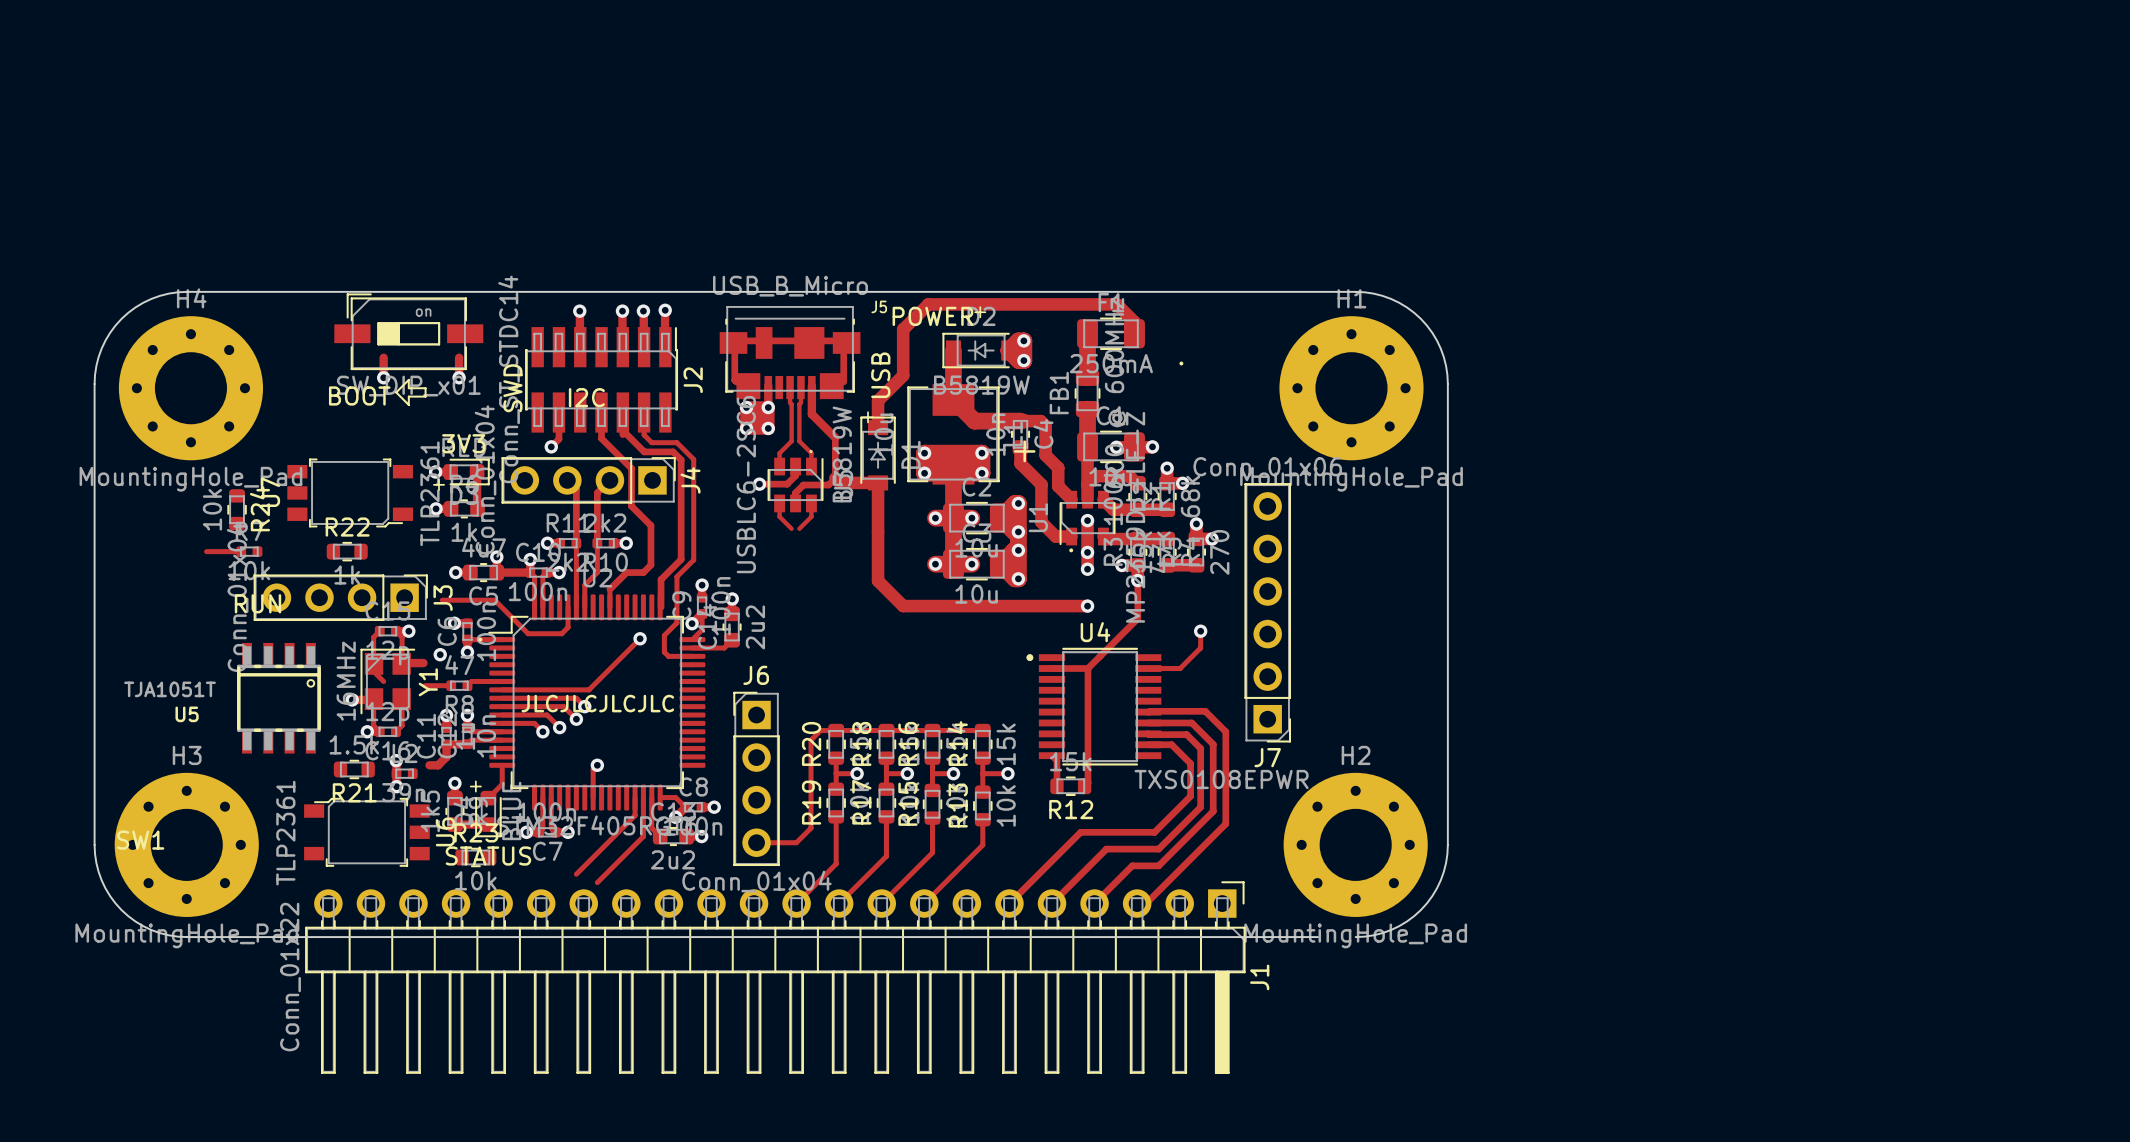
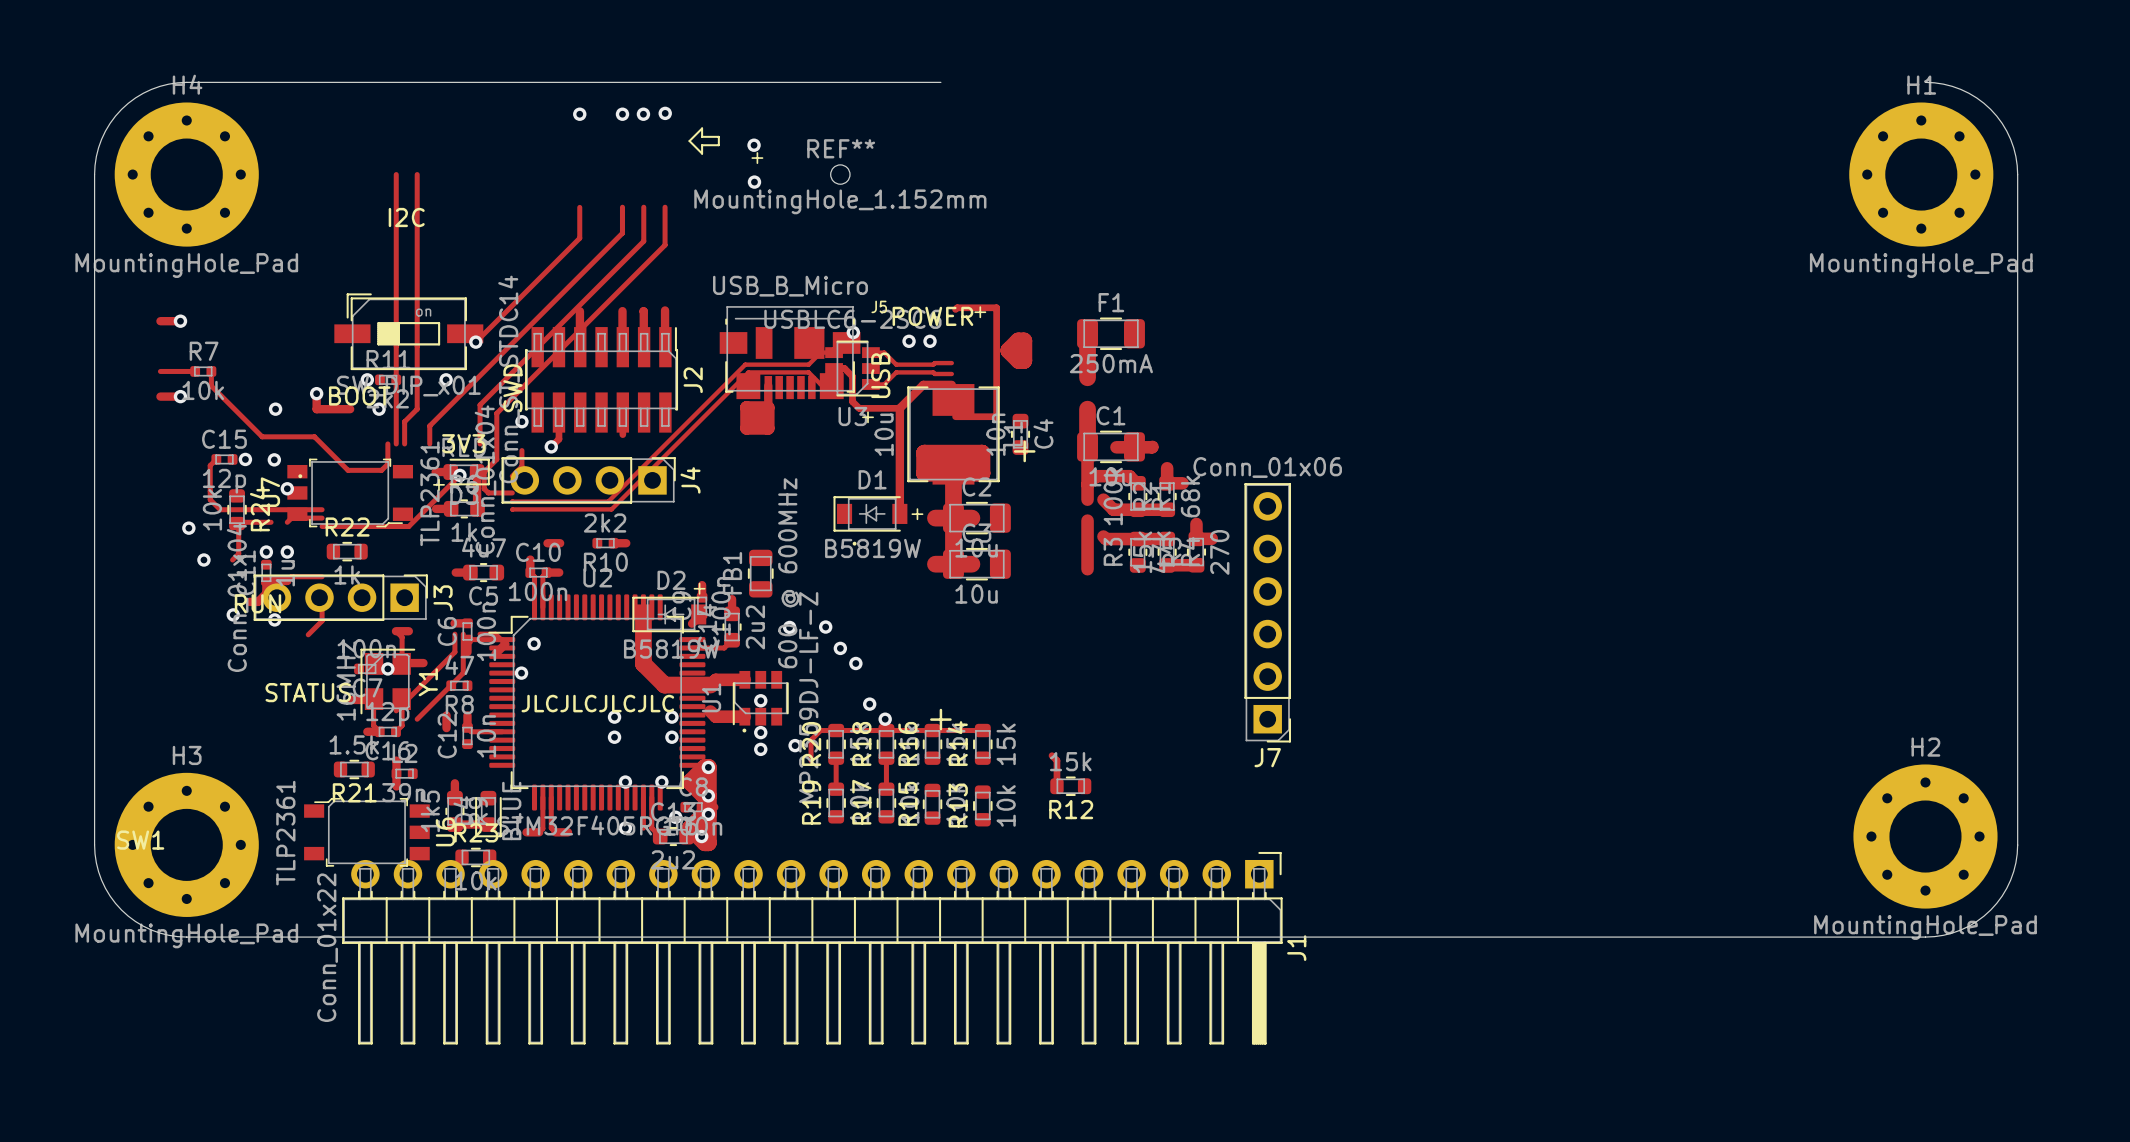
board edge: none -> (1925, 82) (1943, 84) (1960, 89) (1976, 97) (1990, 109) (2002, 123) (2010, 139) (2017, 165) (2017, 845)
via: none -> (665, 113)
via: none -> (579, 114)
via: none -> (622, 114)
via: none -> (643, 114)
via: none -> (754, 145)
text: none -> + (757, 158)
track: none -> (396, 174) (396, 443)
track: none -> (417, 174) (417, 409) (404, 421) (404, 443)
REF**: none -> MountingHole_1.152mm (840, 174)
via: none -> (754, 182)
track: none -> (579, 207) (579, 238) (475, 342)
track: none -> (622, 207) (622, 233) (429, 425) (429, 443)
track: none -> (643, 207) (643, 241) (480, 404) (480, 443)
track: none -> (665, 207) (665, 245) (496, 413) (496, 459) (484, 472) (484, 488) (488, 492) (512, 492)
track: none -> (955, 309) (957, 307) (996, 307) (996, 418) (994, 416) (955, 416)
via: (665, 310) -> none
via: (579, 311) -> none
via: (622, 311) -> none
via: (643, 311) -> none
track: none -> (160, 321) (180, 321)
via: none -> (180, 321)
via: none -> (853, 332)
track: (1134, 333) (1134, 322) (1116, 304) (928, 304) (903, 329) (903, 375) (878, 400) (878, 427) -> none
via: (1023, 340) -> none
via: none -> (909, 341)
via: none -> (930, 341)
via: none -> (475, 342)
track: (953, 350) (953, 399) (974, 421) (1040, 421) (1045, 425) (1045, 455) (1058, 467) (1058, 486) (1071, 499) -> none
D2 position: (979, 350) -> (669, 614)
track: none -> (834, 352) (820, 352) (808, 364) (745, 364) (608, 501) (512, 501)
track: none -> (870, 352) (884, 352) (896, 364) (951, 363)
track: (383, 357) (383, 377) -> none
track: (459, 357) (459, 377) -> none
via: (1023, 360) -> none
drawing: [1179, 361, 1184, 366] -> none
track: none -> (834, 368) (844, 368) (852, 376) (852, 401) (859, 408) (899, 408)
track: none -> (211, 371) (211, 386) (262, 436) (314, 436) (348, 470) (381, 470) (387, 464) (387, 443)
track: none -> (951, 373) (896, 372) (884, 384) (870, 384)
via: (383, 377) -> none
via position: (459, 377) -> (446, 379)
via: none -> (367, 379)
line: (408, 379) (408, 388) (425, 388) (425, 396) (408, 396) (408, 404) (396, 392) (408, 379) -> (702, 128) (702, 136) (718, 136) (718, 145) (702, 145) (702, 153) (689, 141) (702, 128)
track: (736, 381) (734, 380) (734, 340) (845, 340) (843, 342) (843, 381) -> none
board edge: (94, 384) (96, 366) (101, 348) (110, 332) (121, 318) (143, 302) (160, 295) (177, 292) (1355, 291) (1373, 293) (1390, 298) (1406, 307) (1426, 325) (1440, 348) (1447, 375) (1447, 853) (1443, 871) (1436, 888) (1420, 910) (1406, 921) (1390, 930) (1373, 935) (1355, 937) -> (94, 384) (94, 174) (96, 156) (105, 131) (121, 109) (143, 93) (160, 86) (186, 82) (940, 82)
track: none -> (834, 384) (820, 384) (808, 372) (748, 372) (611, 509) (512, 509)
track: none -> (951, 384) (923, 384) (899, 408)
track: (790, 385) (791, 441) (779, 453) (779, 466) -> none
track: (800, 385) (799, 441) (811, 453) (811, 466) -> none
track: (811, 385) (811, 414) (835, 437) (835, 478) -> none
H4 position: (190, 388) -> (186, 174)
H1 position: (1351, 388) -> (1921, 174)
via: none -> (316, 393)
FB1 position: (1087, 393) -> (760, 573)
track: none -> (160, 396) (180, 396)
via: none -> (180, 396)
text position: I2C (586, 397) -> I2C (406, 217)
via: (746, 407) -> none
via: (768, 407) -> none
track: none -> (899, 408) (899, 513)
via: none -> (275, 409)
via: none -> (379, 409)
track: (601, 412) (601, 438) (631, 468) (631, 506) (650, 525) (650, 565) (643, 572) (626, 572) (609, 589) (609, 607) -> none
track: (644, 412) (644, 434) (651, 442) (676, 442) (693, 459) (693, 560) (676, 576) (676, 622) (664, 635) (664, 652) (668, 656) (692, 656) -> none
via: none -> (521, 421)
via: (746, 428) -> none
via: (768, 428) -> none
track: (622, 430) (644, 451) (673, 451) (681, 459) (681, 559) (661, 579) (661, 607) -> none
via: (1152, 446) -> none
track: (1020, 447) (1020, 463) (1041, 484) (1041, 522) (1055, 536) (1071, 536) -> none
via: (1116, 447) -> none
drawing position: (811, 451) -> (886, 384)
D1 rotation: 0° (878, 453) -> 90° counterclockwise (870, 513)
D1 position: (878, 453) -> (870, 513)
via: (924, 453) -> none
via: (981, 453) -> none
track: none -> (216, 459) (210, 465) (210, 499) (220, 509) (322, 509)
via: none -> (245, 459)
via: none -> (274, 459)
track: (795, 466) (795, 475) (787, 484) (759, 484) -> none
via: (1167, 468) -> none
via: (435, 472) -> none
via: (924, 473) -> none
via: (981, 473) -> none
drawing: none -> [298, 474, 303, 479]
via: none -> (459, 475)
track: (835, 478) (839, 482) (878, 482) (878, 580) (903, 606) (1087, 606) -> none
track: (835, 478) (828, 485) (803, 485) (795, 492) (795, 503) -> none
track: (567, 480) (576, 489) (576, 607) -> none
track: (609, 480) (597, 492) (597, 572) (584, 585) (584, 607) -> none
via: (1182, 483) -> none
via: (759, 484) -> none
U3 rotation: 0° (795, 485) -> 90° clockwise (852, 368)
U3 position: (795, 485) -> (852, 368)
via: none -> (287, 488)
track: (779, 503) (779, 516) (791, 528) -> none
track: (811, 503) (811, 516) (799, 528) -> none
via: (1018, 503) -> none
via: (436, 508) -> none
text: none -> + (917, 514)
via: (935, 518) -> none
via: (971, 518) -> none
U1 position: (1087, 518) -> (760, 698)
via: (1087, 520) -> none
track: none -> (271, 522) (244, 522) (238, 528) (238, 553) (232, 560)
via: (1196, 523) -> none
via: none -> (188, 528)
track: (1018, 531) (1014, 531) (1000, 518) (1015, 503) (1018, 503) (1018, 578) (1015, 578) (1000, 564) (1014, 550) (1018, 550) -> (708, 795) (704, 795) (690, 782) (705, 767) (708, 767) (708, 842) (705, 842) (690, 828) (704, 814) (708, 814)
via: (1018, 531) -> none
via: (1211, 539) -> none
drawing: none -> [852, 541, 857, 546]
via: (547, 543) -> none
R11 position: (568, 543) -> (388, 379)
via: (626, 543) -> none
drawing: [1069, 548, 1074, 553] -> none
via: (1018, 550) -> none
track: (206, 551) (241, 551) -> (160, 371) (195, 371)
R7 position: (249, 551) -> (203, 371)
via: none -> (266, 552)
via: none -> (287, 552)
via: (1087, 552) -> none
track: (496, 557) (496, 572) (530, 572) -> (316, 393) (316, 409) (350, 409)
via: (496, 557) -> none
via: (530, 559) -> none
via: none -> (203, 560)
via: (935, 564) -> none
via: (971, 564) -> none
track: (1121, 565) (1137, 565) (1137, 618) (1087, 668) -> none
via: (1121, 565) -> none
via: (1087, 569) -> none
via: (455, 572) -> none
via: (559, 572) -> none
via: (1018, 578) -> none
via: (1137, 580) -> none
via: (702, 585) -> none
text: none -> + (699, 588)
via: (732, 598) -> none
track: (442, 600) (494, 600) (528, 633) (561, 633) (568, 627) (568, 607) -> none
via: (1087, 606) -> none
track: (702, 613) (702, 629) (692, 639) -> (521, 450) (521, 466) (512, 476)
via: none -> (233, 614)
track: none -> (643, 614) (643, 663) (664, 685) (710, 685) (715, 679) (744, 679)
via: none -> (274, 619)
via: (454, 623) -> none
via: (692, 623) -> none
via: none -> (789, 627)
via: none -> (825, 627)
track: (379, 631) (373, 637) (373, 671) (383, 681) -> none
C15 position: (387, 631) -> (224, 459)
via: (408, 631) -> none
track: (1200, 631) (1200, 647) (1180, 668) (1148, 668) -> none
via: (1200, 631) -> none
track: none -> (463, 634) (463, 673) (417, 719)
drawing: [478, 637, 483, 642] -> none
track: (640, 638) (588, 689) (502, 689) -> (459, 475) (408, 526) (322, 526)
via: (640, 638) -> none
via: none -> (534, 643)
via: none -> (840, 648)
via: (467, 652) -> none
via: (440, 654) -> none
via: none -> (855, 663)
via: none -> (387, 668)
track: (1052, 668) (1087, 668) -> none
track: (1087, 668) (1087, 782) (1084, 786) -> none
via: none -> (521, 673)
track: (502, 681) (471, 681) (467, 685) -> (322, 518) (291, 518) (287, 522)
track: (424, 685) (451, 685) -> none
U5: TJA1051T (278, 698) -> none
track: (502, 698) (576, 698) (584, 706) -> none
via: (352, 699) -> none
via: none -> (760, 700)
via: none -> (869, 704)
track: (502, 706) (563, 706) (576, 719) -> none
via: (584, 706) -> none
U4: TXS0108EPWR (1093, 706) -> none
track: none -> (710, 711) (715, 716) (744, 716)
track: (1148, 712) (1205, 711) (1225, 731) (1225, 823) (1146, 903) (1137, 903) -> none
via: (446, 715) -> none
via: (467, 715) -> none
track: (502, 715) (547, 715) (559, 727) -> none
via: none -> (614, 717)
via: none -> (671, 717)
via: (576, 719) -> none
via: none -> (885, 719)
text: none -> + (940, 719)
track: (1148, 722) (1191, 722) (1213, 744) (1213, 811) (1158, 865) (1132, 865) (1094, 903) -> none
track: (502, 723) (534, 723) (542, 731) -> none
via: (559, 727) -> none
drawing: none -> [742, 728, 747, 733]
via: (367, 731) -> none
via: (542, 731) -> none
via: none -> (760, 732)
track: (1148, 733) (1186, 734) (1200, 748) (1200, 807) (1158, 849) (1106, 849) (1052, 903) -> none
C11 position: (446, 736) -> (266, 572)
via: none -> (614, 737)
via: none -> (671, 737)
track: (502, 740) (471, 740) (467, 744) (446, 744) (446, 756) (438, 765) (429, 765) -> (322, 576) (291, 576) (287, 580) (266, 580) (266, 593) (257, 601) (249, 601)
track: (1148, 744) (1171, 744) (1190, 763) (1190, 796) (1154, 832) (1080, 832) (1009, 903) -> none
via: none -> (795, 745)
via: none -> (760, 749)
track: (932, 758) (932, 790) -> none
track: (982, 758) (982, 792) -> none
via: (396, 760) -> none
track: (811, 760) (811, 828) (796, 842) (756, 842) -> none
track: (502, 765) (502, 784) (488, 798) -> (322, 601) (322, 620) (308, 634)
track: (597, 765) (593, 769) (593, 797) -> none
via: (597, 765) -> none
via: none -> (708, 767)
track: (836, 773) (857, 773) -> none
via: (857, 773) -> none
track: (886, 773) (907, 773) -> none
via: (907, 773) -> none
track: (932, 773) (953, 773) -> none
via: (953, 773) -> none
track: (982, 773) (1007, 773) -> none
via: (1007, 773) -> none
J6: Conn_01x04 (756, 778) -> none
via: none -> (625, 782)
via: none -> (661, 782)
via: (454, 783) -> none
via: (396, 786) -> none
text: + (475, 786) -> none
via: none -> (708, 795)
track: (635, 797) (635, 815) (576, 874) -> (454, 634) (454, 652) (396, 710)
track: (660, 797) (675, 797) (685, 807) (675, 817) -> (480, 634) (495, 634) (505, 643) (495, 653)
via: (714, 807) -> none
via: none -> (708, 814)
track: (836, 816) (836, 864) (796, 903) -> none
track: (886, 816) (886, 856) (839, 903) -> none
track: (932, 818) (932, 852) (881, 903) -> none
track: (982, 819) (982, 845) (924, 903) -> none
via: none -> (625, 828)
track: (643, 828) (643, 836) (597, 882) -> none
via: (526, 832) -> none
C7 position: (547, 832) -> (367, 668)
via: (568, 832) -> none
H2 position: (1355, 844) -> (1925, 836)
board edge: none -> (2017, 844) (2015, 862) (2010, 880) (2002, 896) (1990, 910) (1968, 926) (1952, 933) (1934, 936) (1317, 937)
text position: STATUS (488, 856) -> STATUS (308, 692)
J1 position: (775, 977) -> (812, 948)

